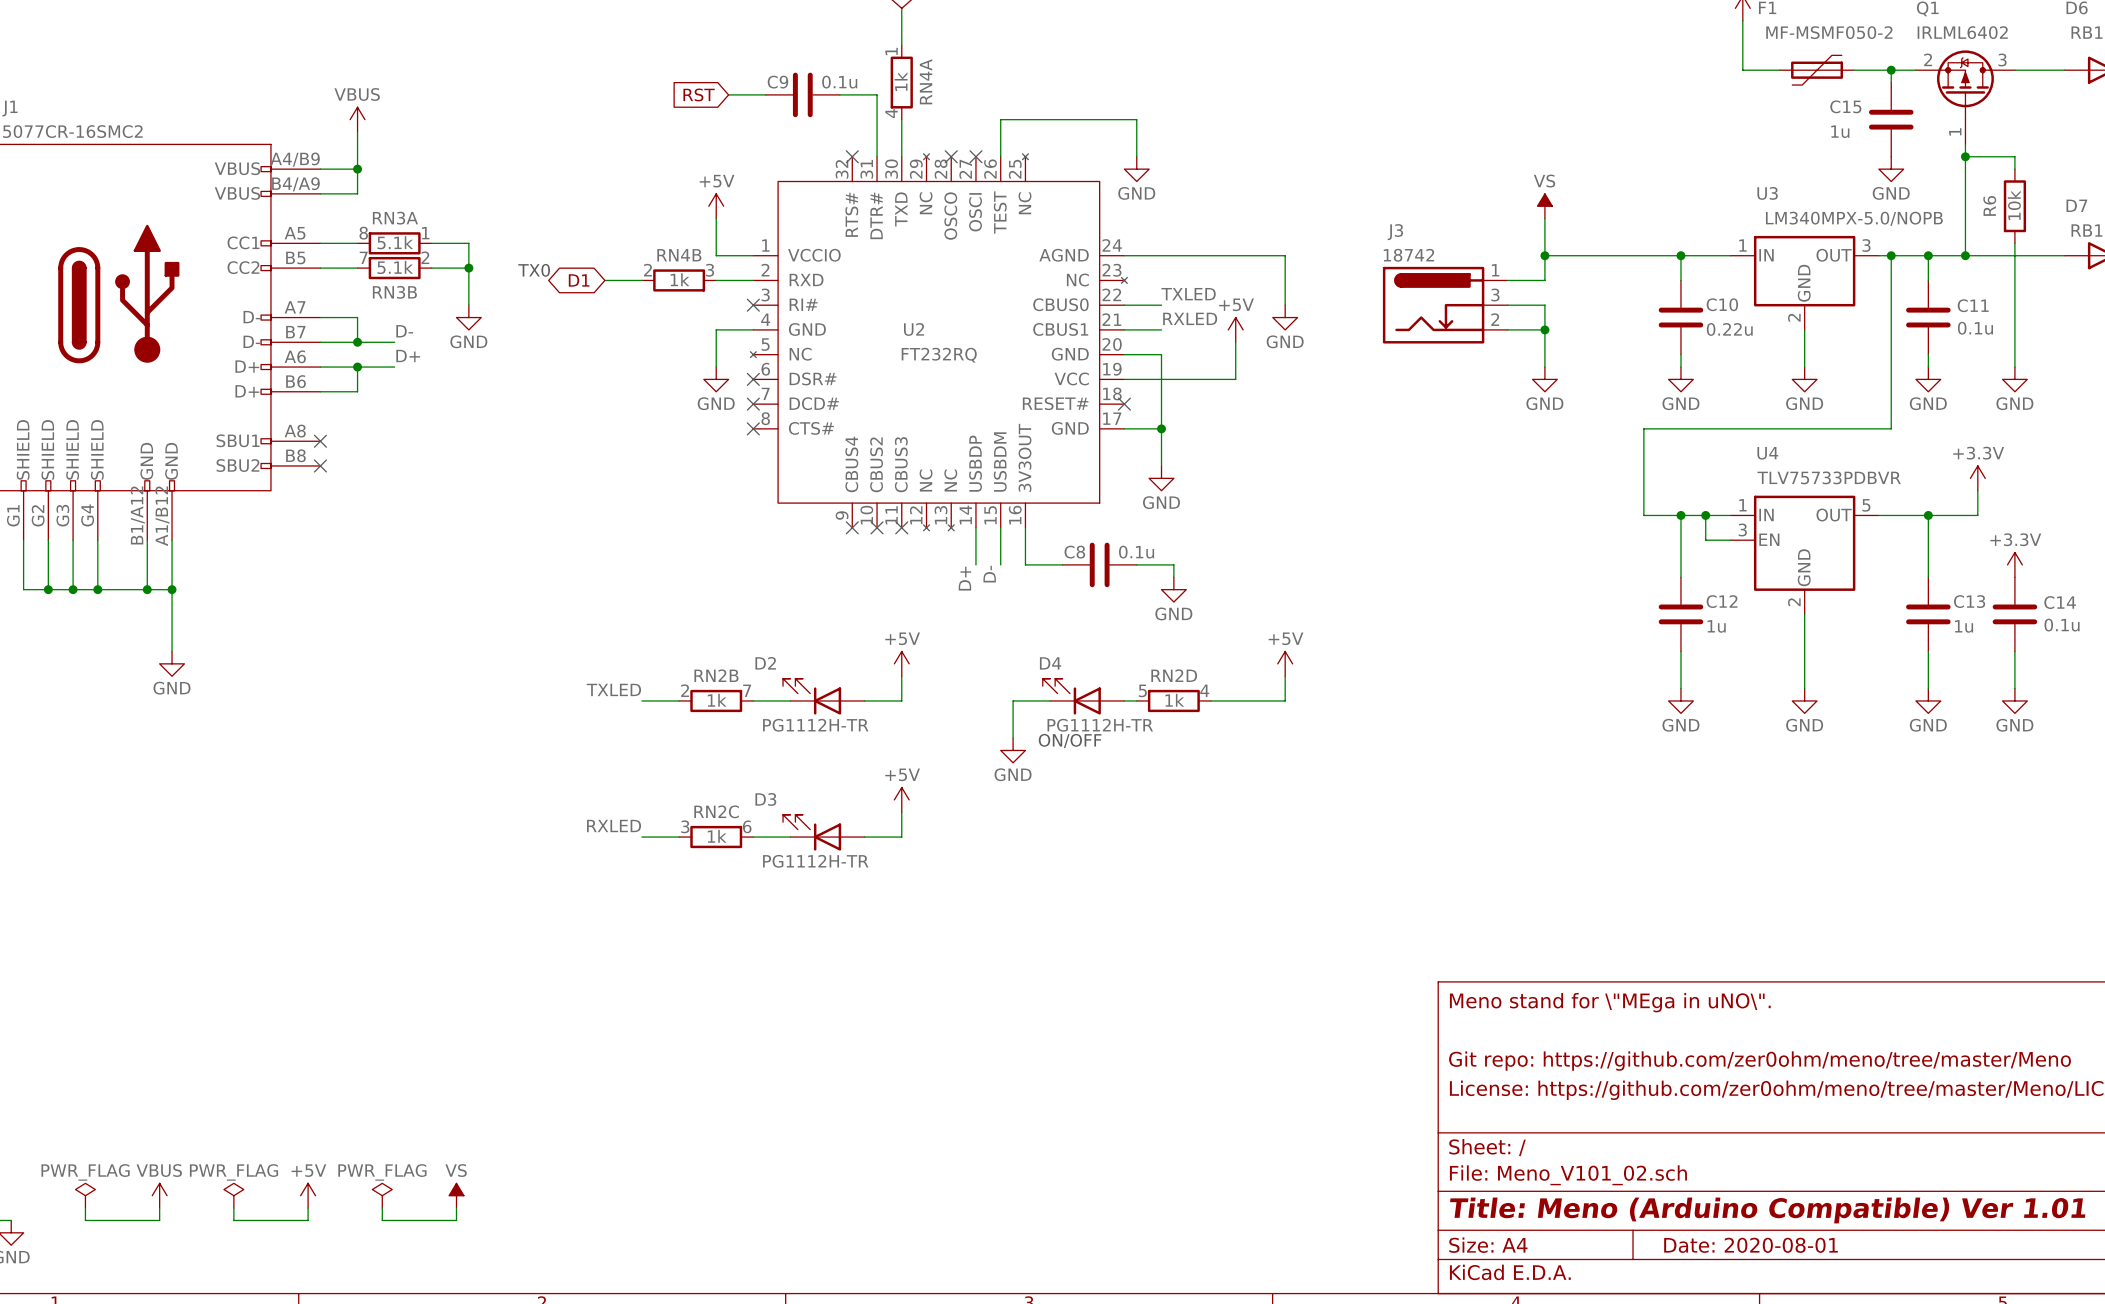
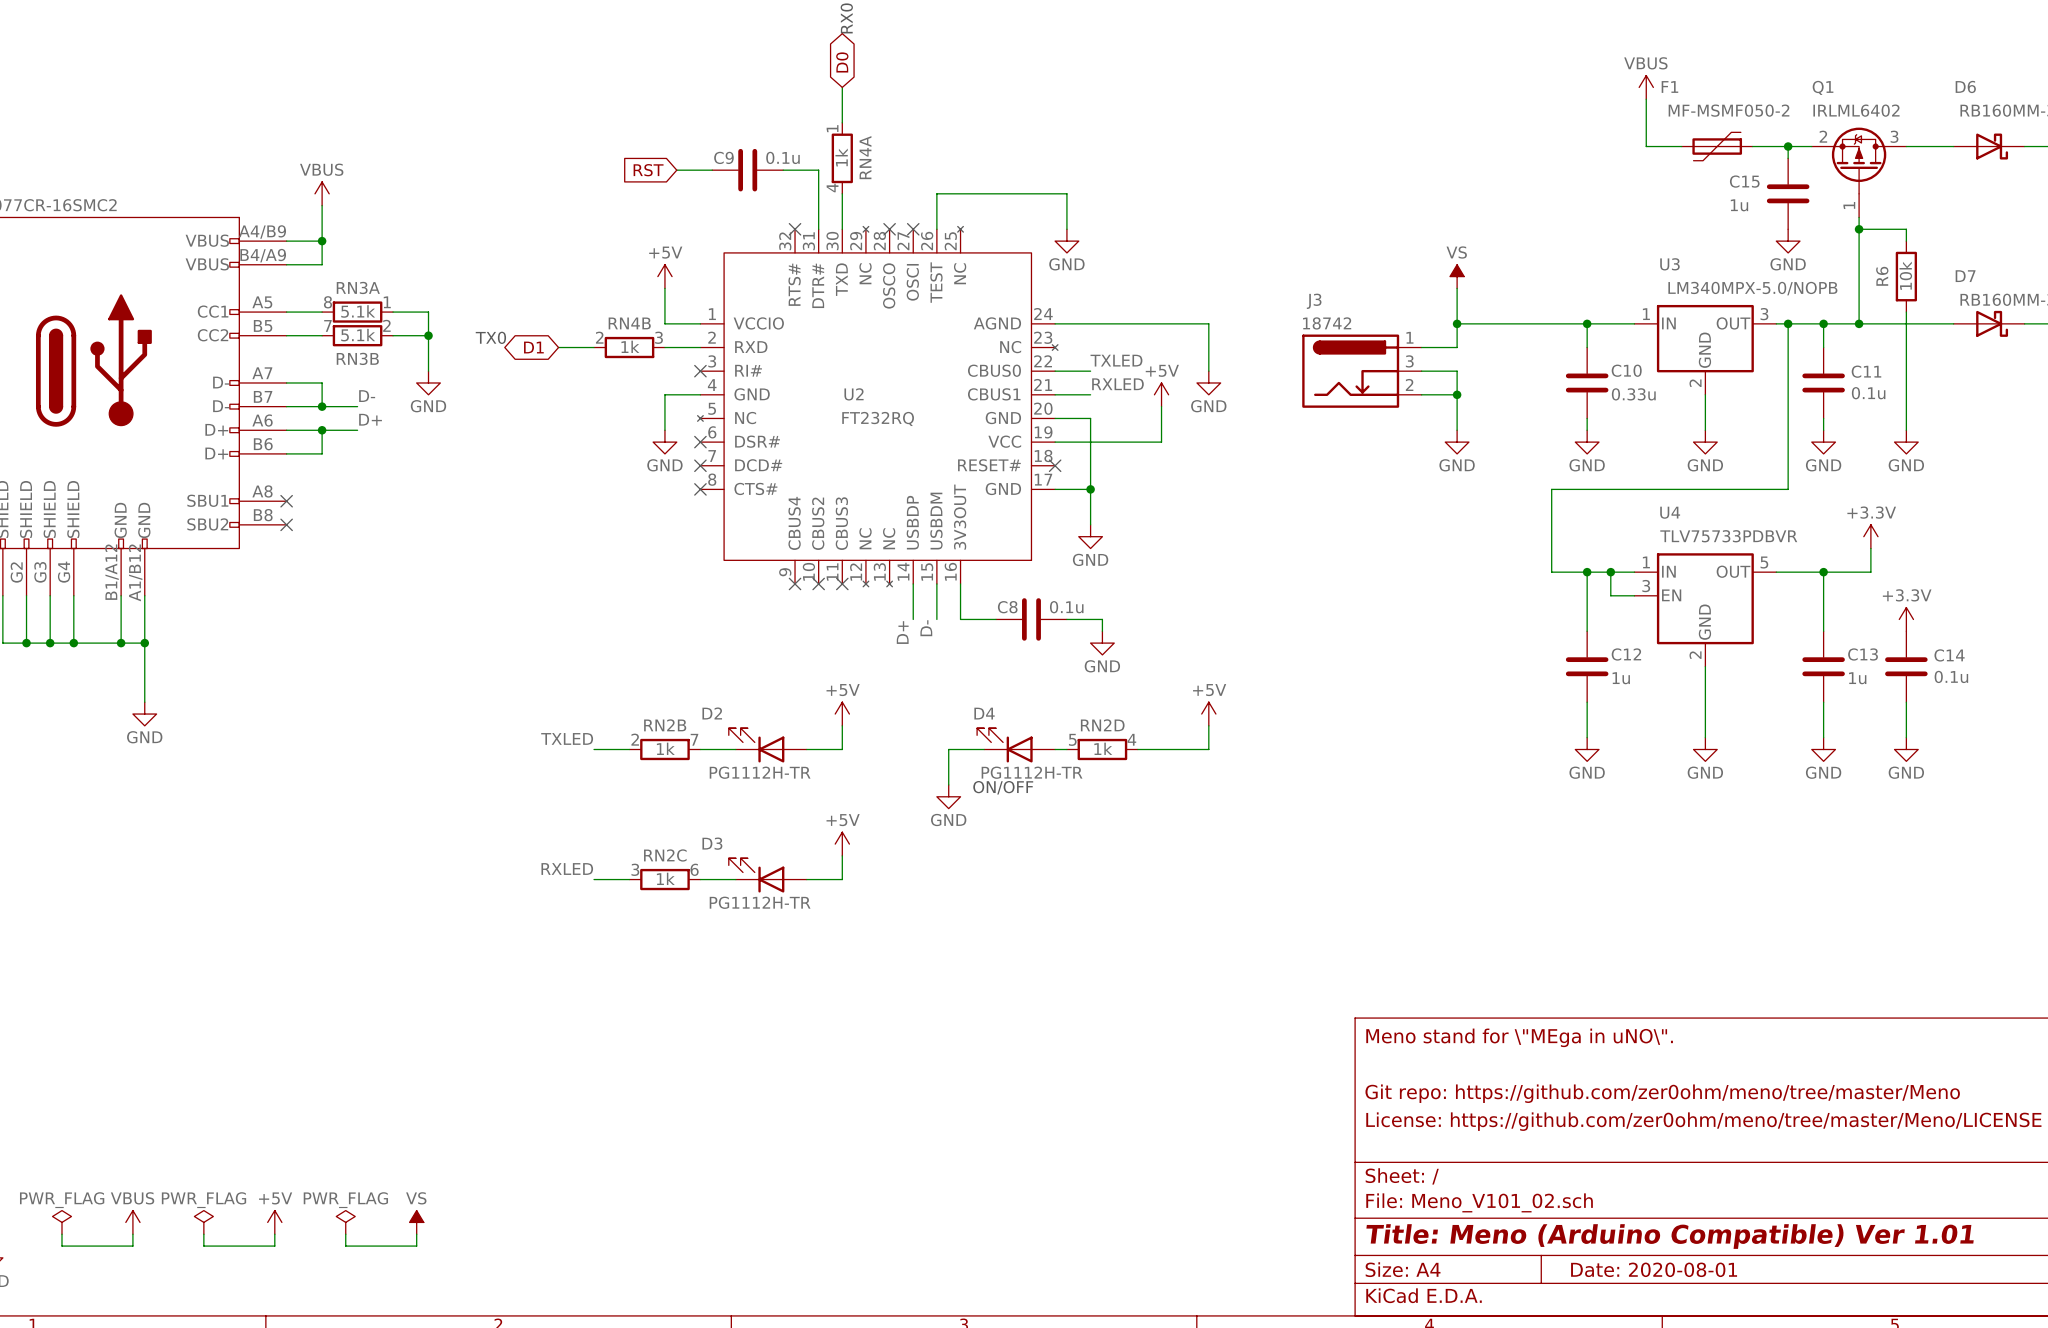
C10 value: 0.22u (1729, 329) -> 0.33u (1633, 394)

